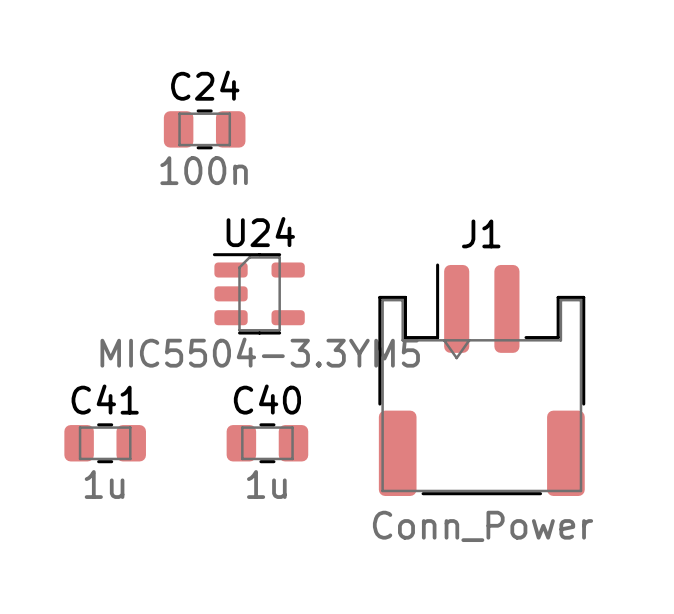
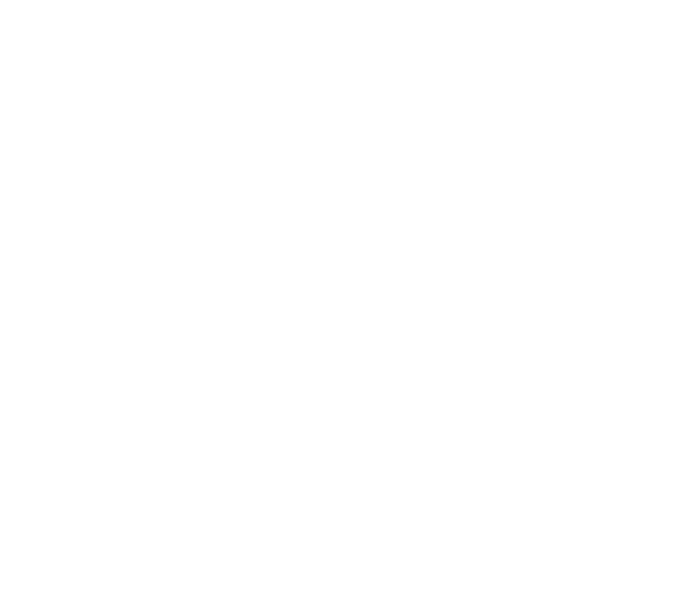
C24: 100n (204, 129) -> none
U24: MIC5504-3.3YM5 (258, 293) -> none
J1: Conn_Power (481, 379) -> none
C41: 1u (105, 443) -> none
C40: 1u (267, 443) -> none

